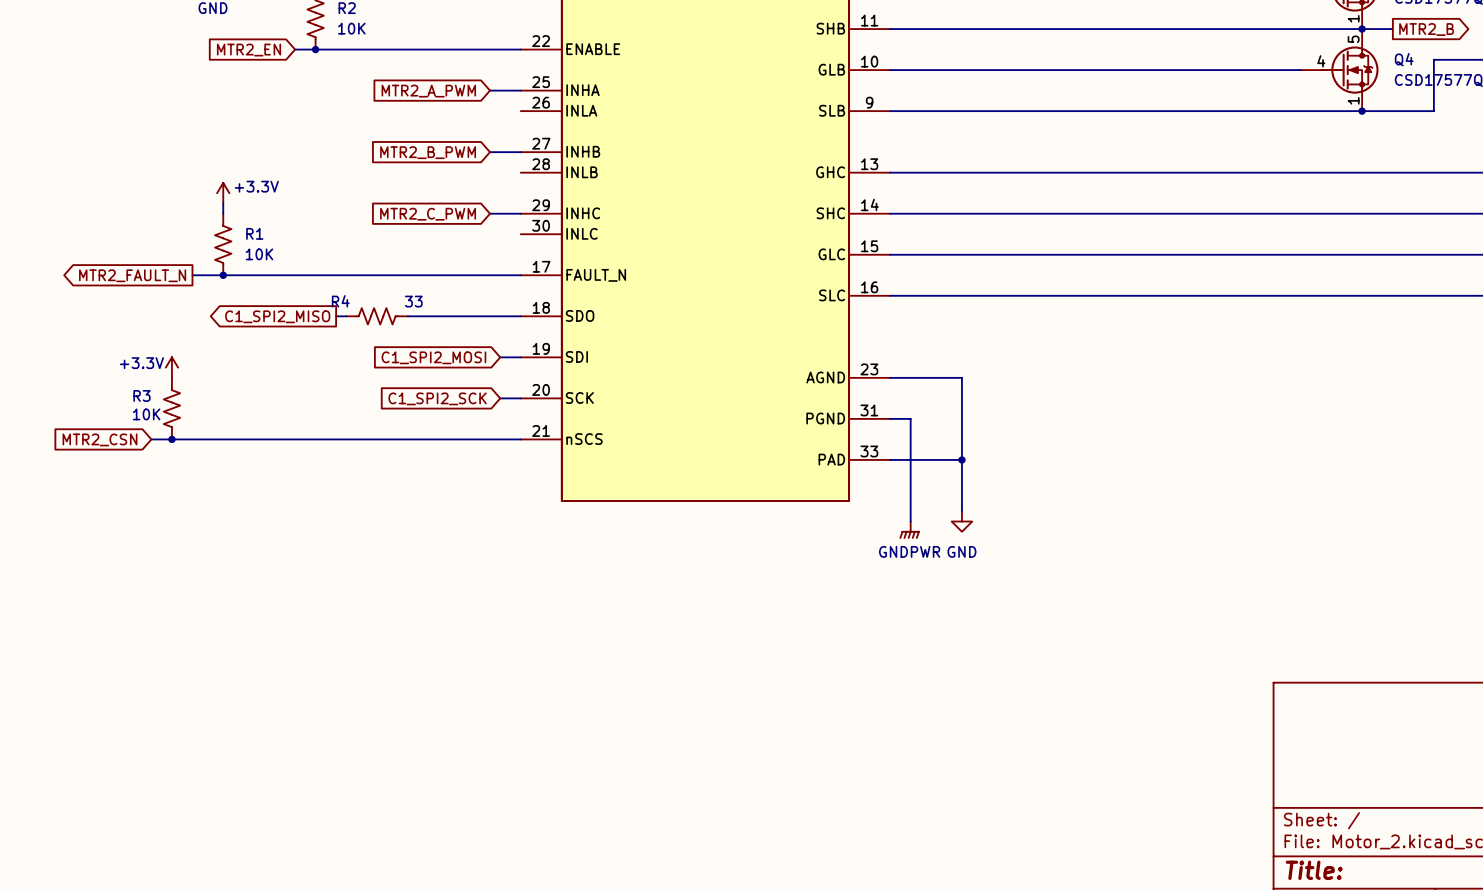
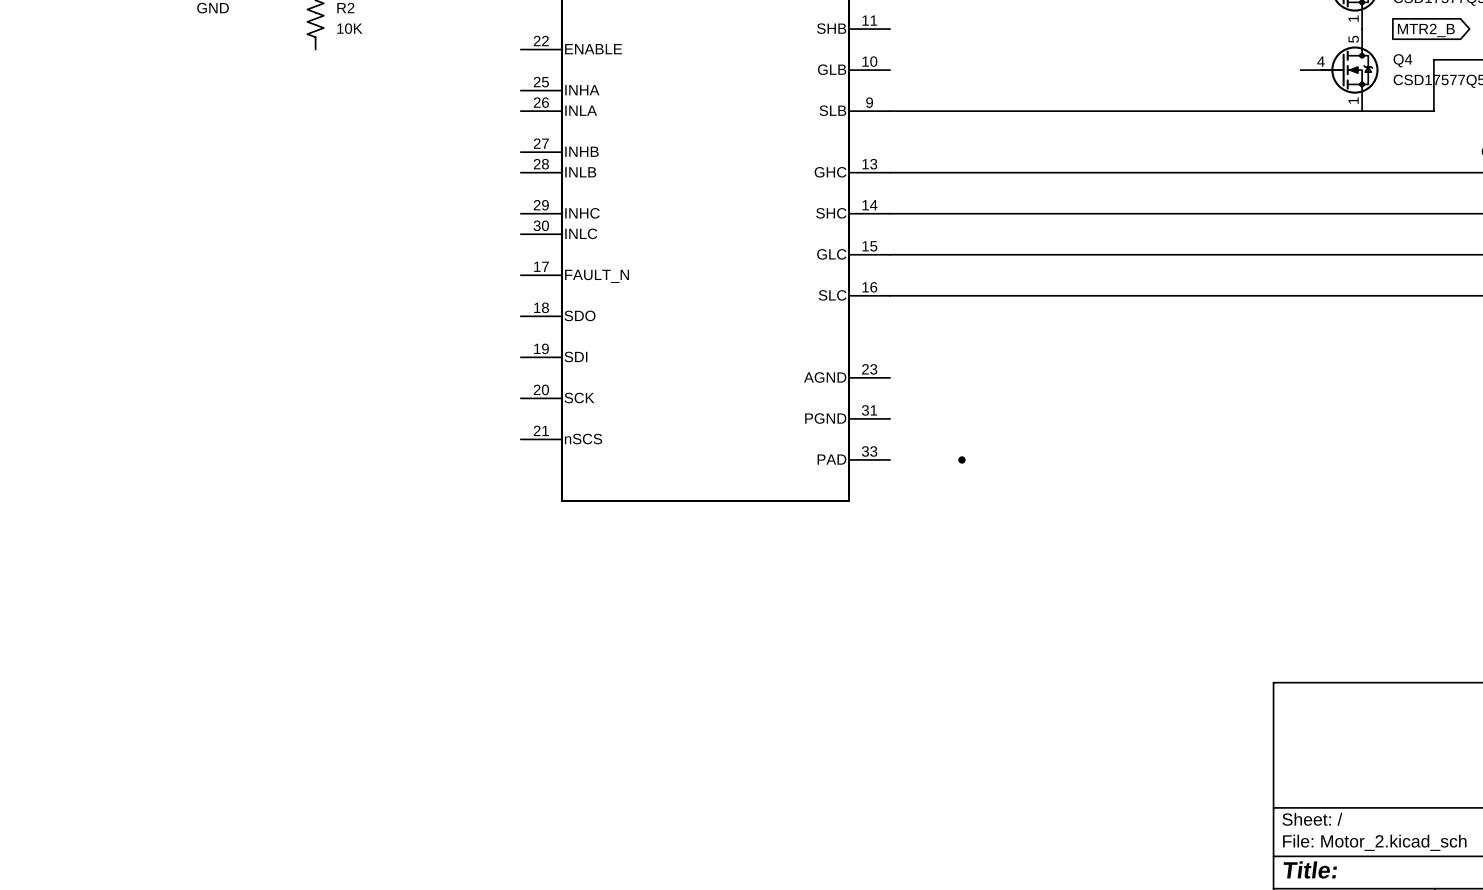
wire: (890, 29) (1392, 29) -> none
junction: (1362, 29) -> none
wire: (295, 49) (520, 49) -> none
junction: (315, 49) -> none
global label: MTR2_EN (249, 50) -> none
wire: (890, 70) (1300, 70) -> none
wire: (490, 90) (520, 90) -> none
global label: MTR2_A_PWM (428, 91) -> none
junction: (1362, 111) -> none
global label: MTR2_B_PWM (428, 152) -> none
wire: (490, 152) (520, 152) -> none
power symbol: +3.3V (223, 193) -> none
wire: (223, 203) (223, 213) -> none
wire: (490, 213) (520, 213) -> none
global label: MTR2_C_PWM (428, 214) -> none
R1: 10K (223, 244) -> none
global label: MTR2_FAULT_N (132, 275) -> none
wire: (192, 275) (520, 275) -> none
junction: (223, 275) -> none
global label: C1_SPI2_MISO (277, 316) -> none
wire: (336, 316) (346, 316) -> none
R4: 33 (377, 316) -> none
wire: (407, 316) (520, 316) -> none
global label: C1_SPI2_MOSI (433, 357) -> none
wire: (500, 357) (520, 357) -> none
power symbol: +3.3V (171, 367) -> none
wire: (890, 377) (961, 377) (961, 511) -> none
global label: C1_SPI2_SCK (437, 398) -> none
wire: (500, 398) (520, 398) -> none
R3: 10K (171, 408) -> none
wire: (890, 418) (910, 418) (910, 521) -> none
global label: MTR2_CSN (99, 439) -> none
wire: (151, 439) (520, 439) -> none
junction: (171, 439) -> none
wire: (890, 459) (961, 459) -> none
power symbol: GND (961, 521) -> none
power symbol: GNDPWR (909, 530) -> none

